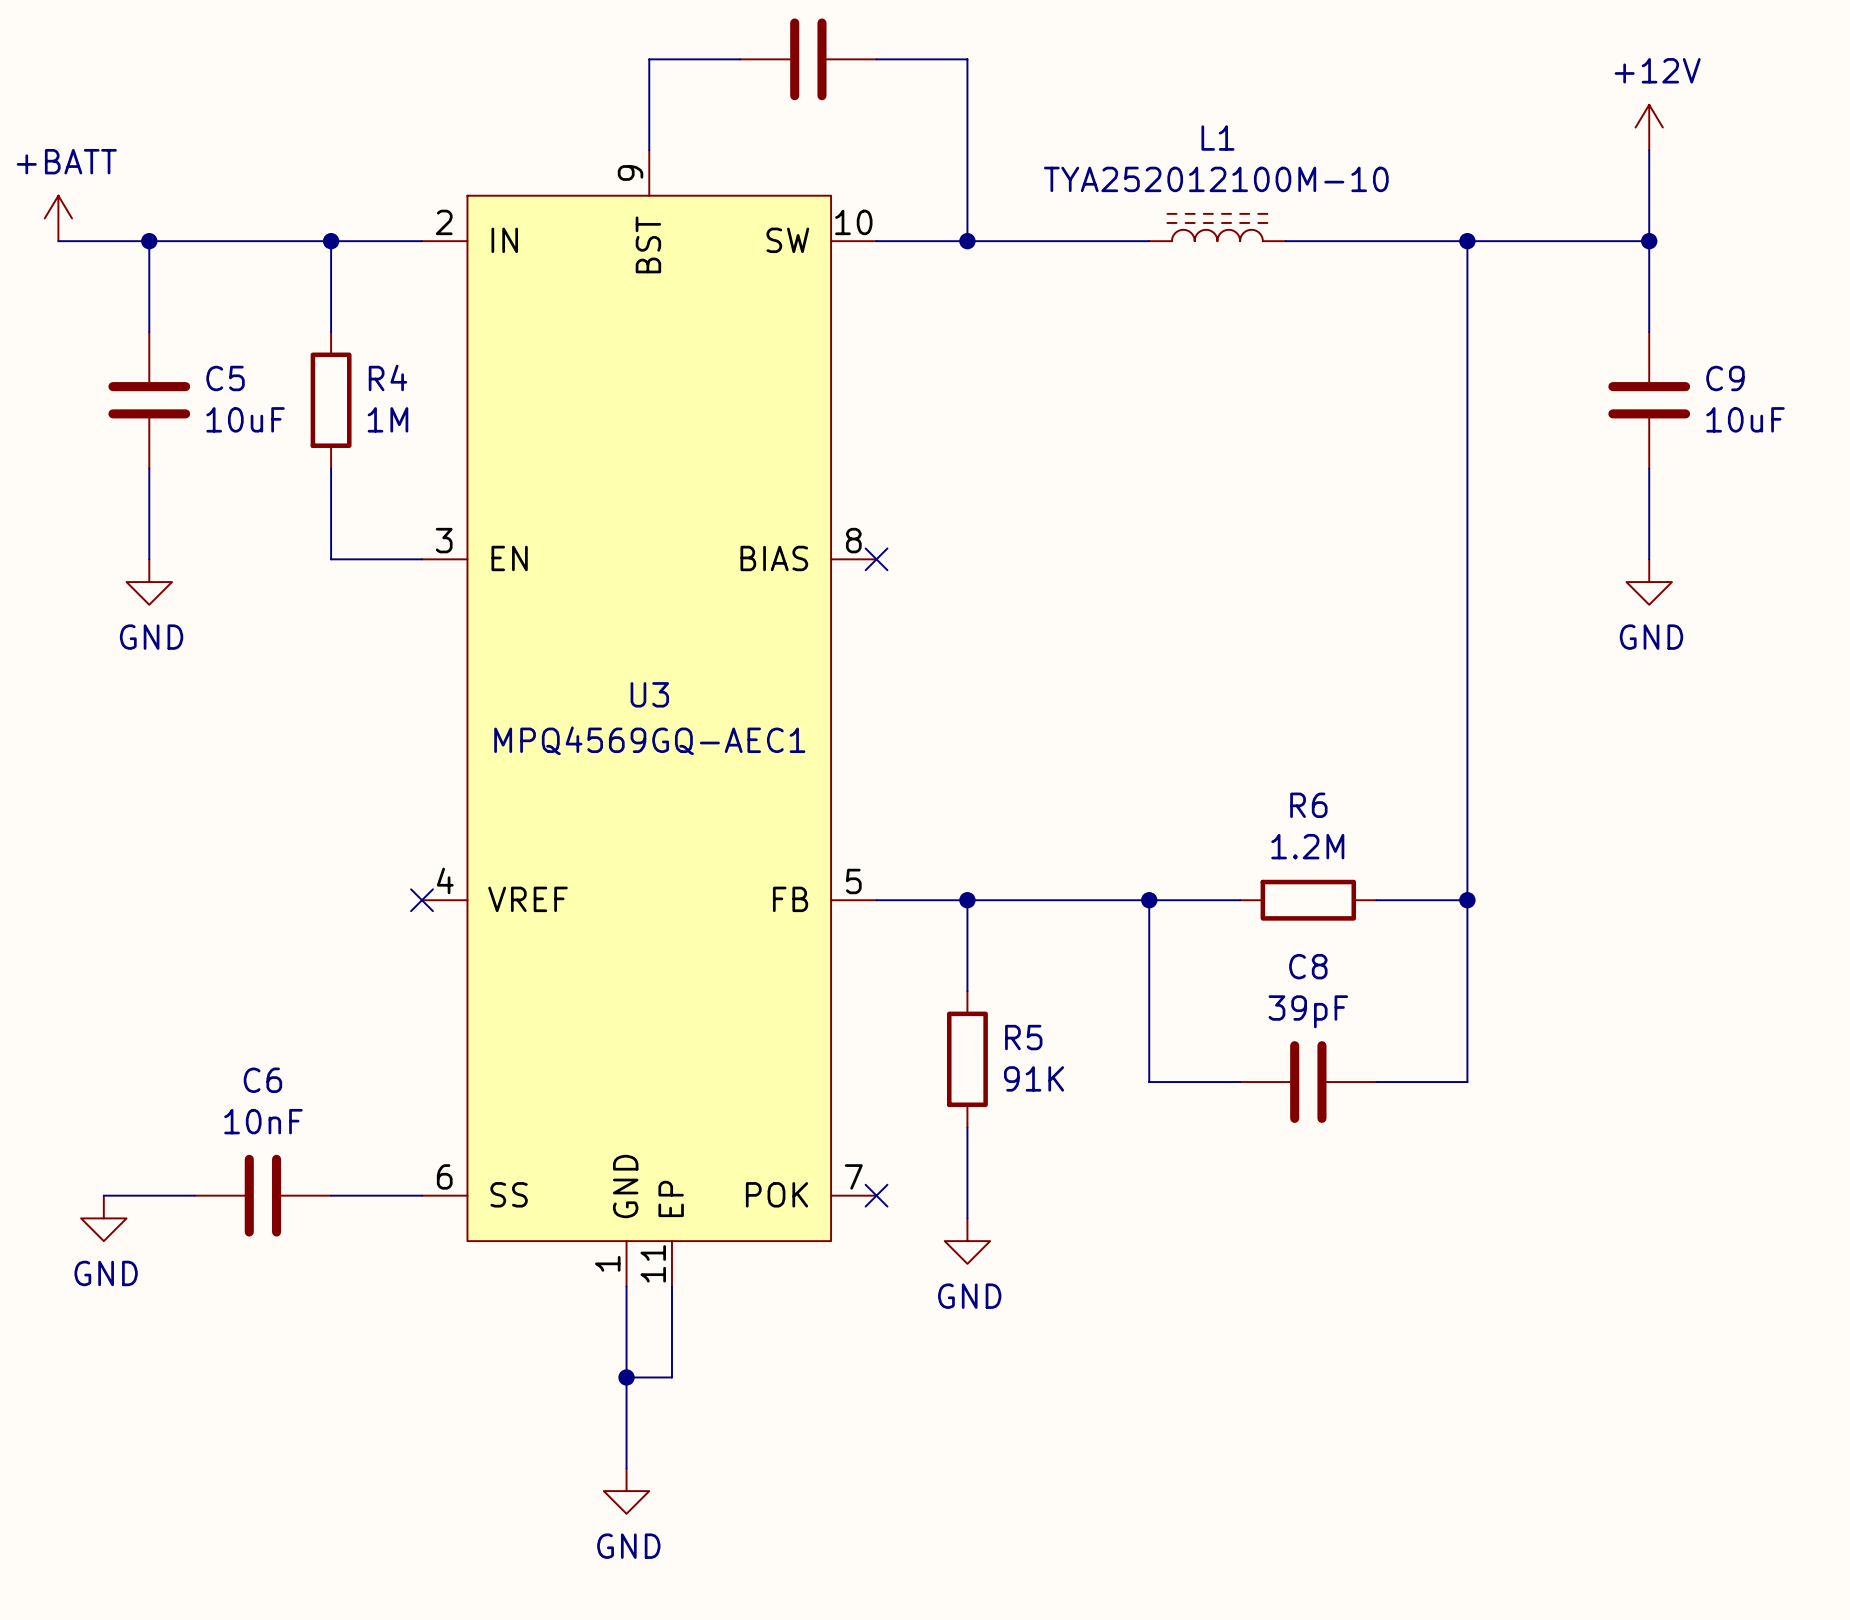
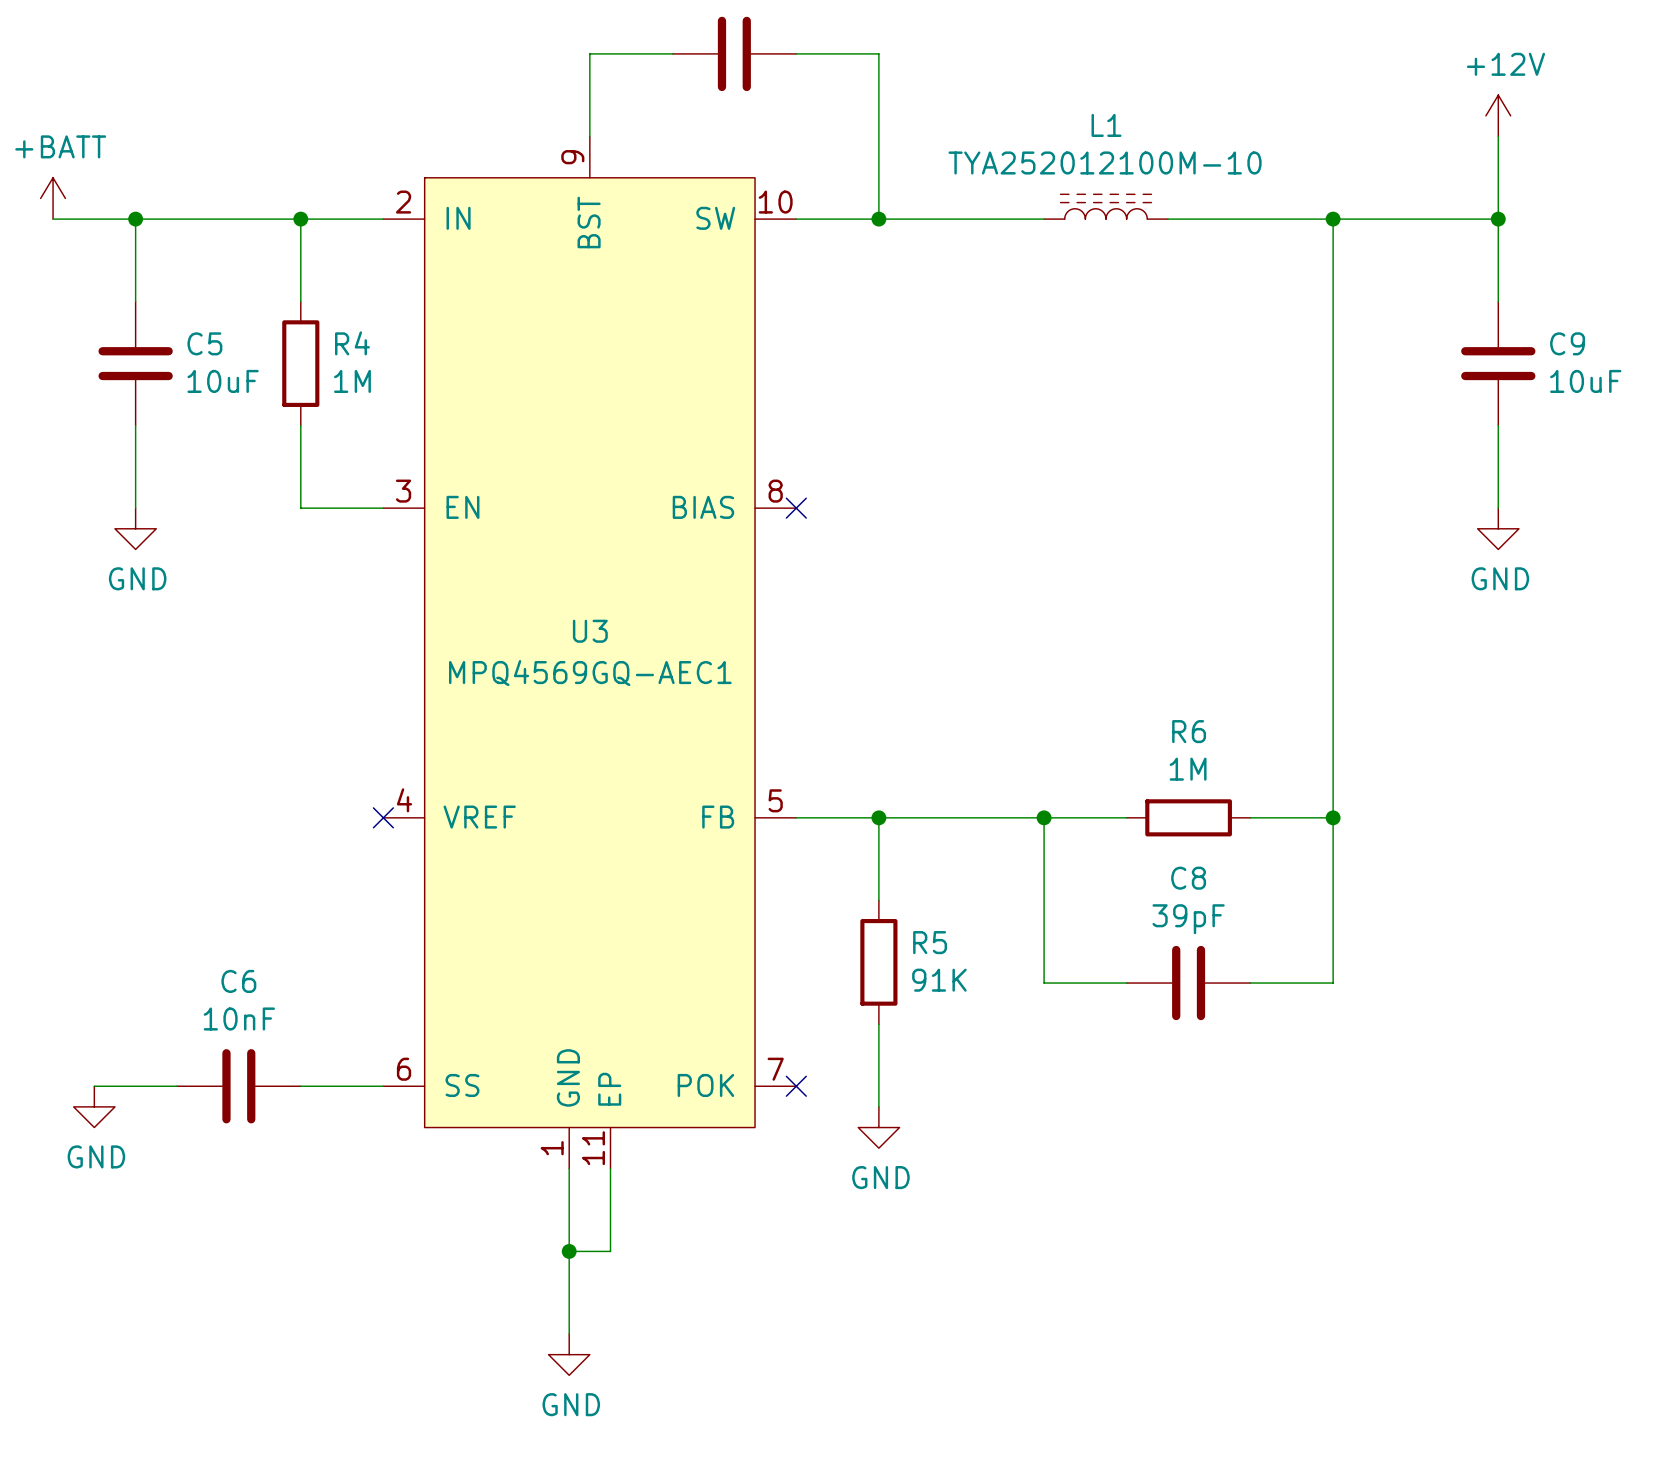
R6 value: 1.2M (1307, 846) -> 1M (1188, 769)

